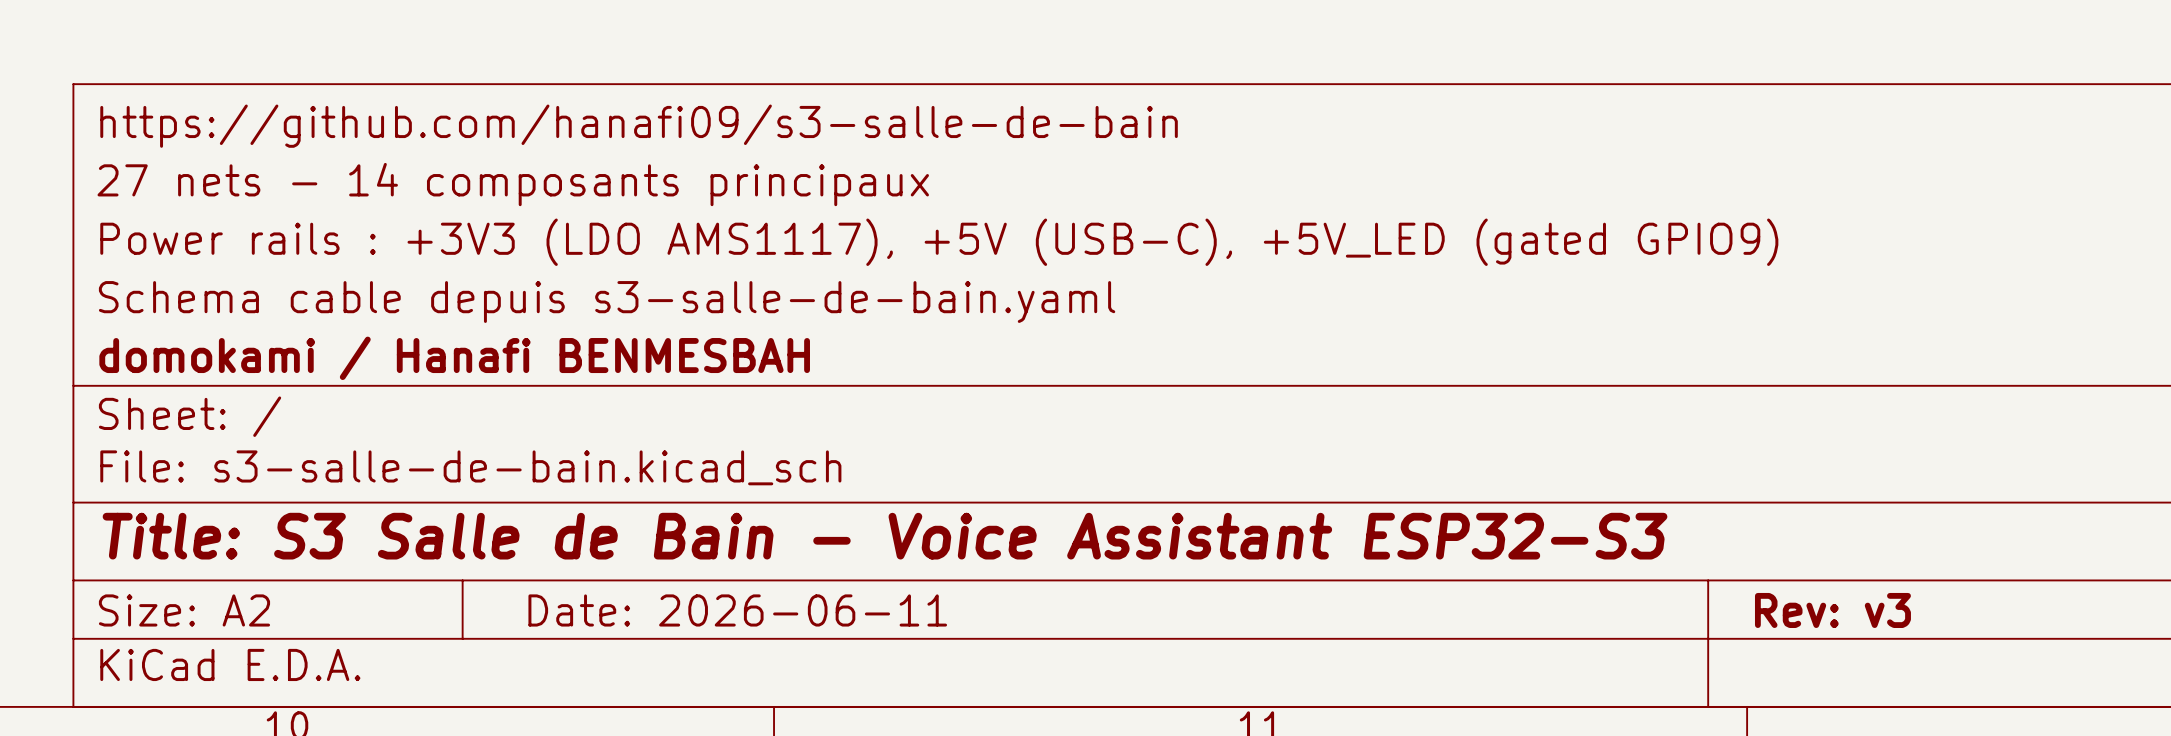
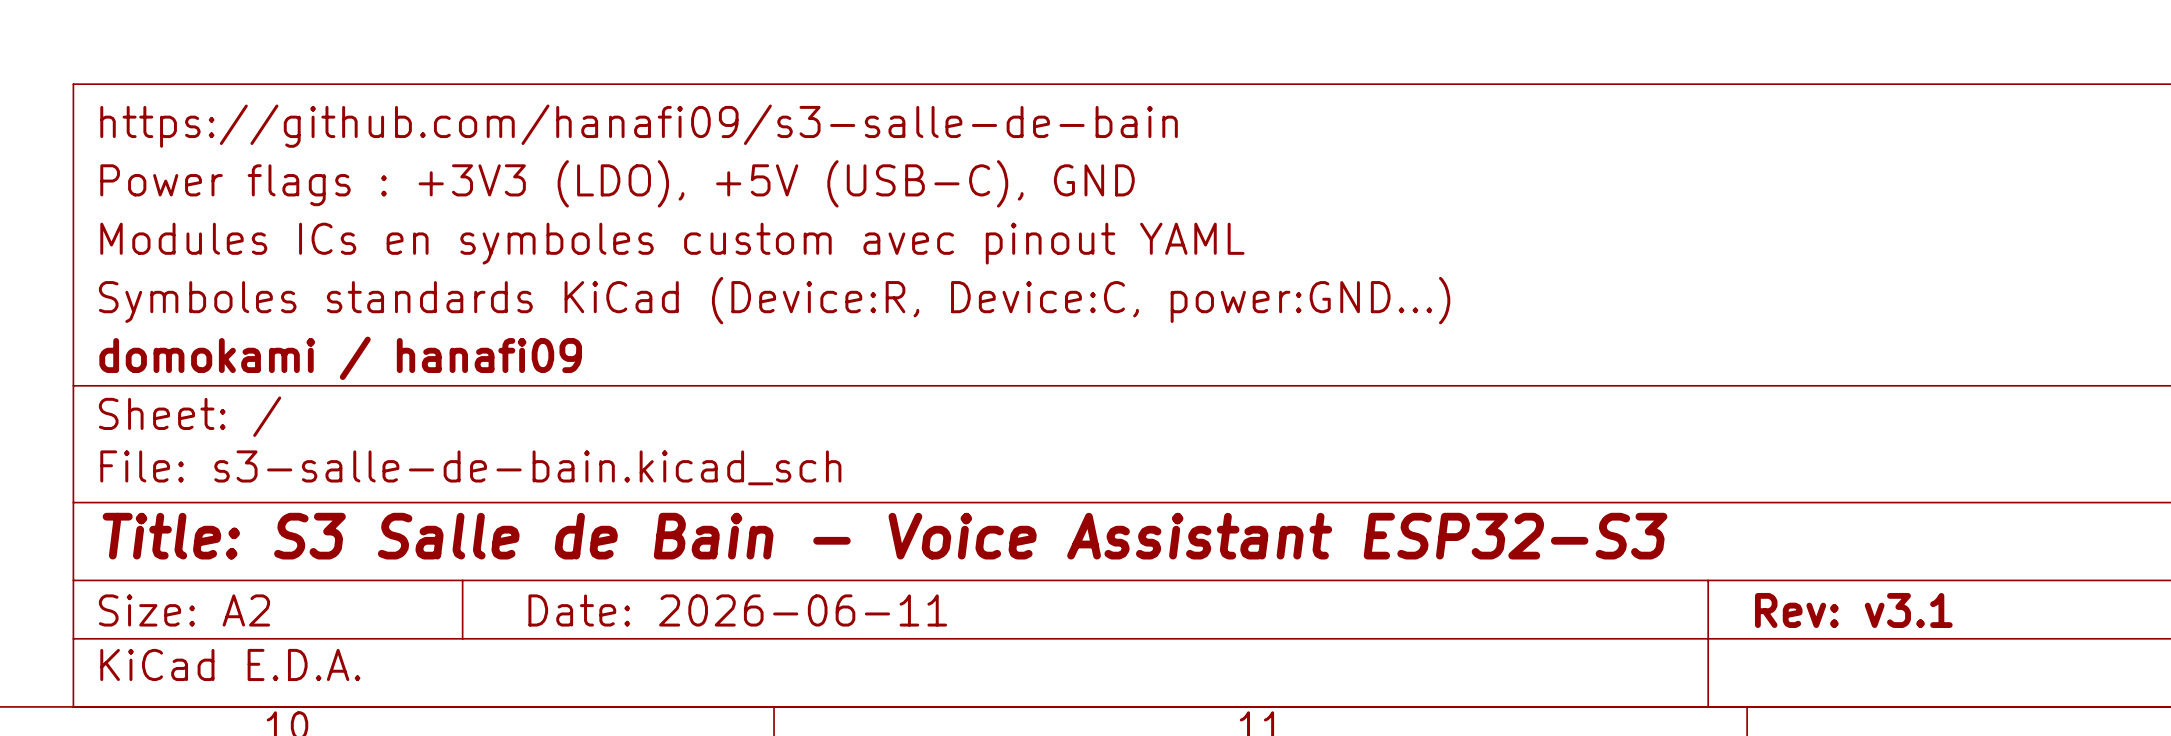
title block: 27 nets - 14 composants principaux (513, 184) -> Power flags : +3V3 (LDO), +5V (USB-C), GND (617, 183)
title block: Power rails : +3V3 (LDO AMS1117), +5V (USB-C), +5V_LED (gated GPIO9) (939, 242) -> Modules ICs en symboles custom avec pinout YAML (672, 243)
title block: Schema cable depuis s3-salle-de-bain.yaml (607, 302) -> Symboles standards KiCad (Device:R, Device:C, power:GND...) (774, 300)
title block: domokami / Hanafi BENMESBAH (454, 358) -> domokami / hanafi09 (340, 358)
title block: Rev: v3 (1832, 610) -> Rev: v3.1 (1853, 610)

